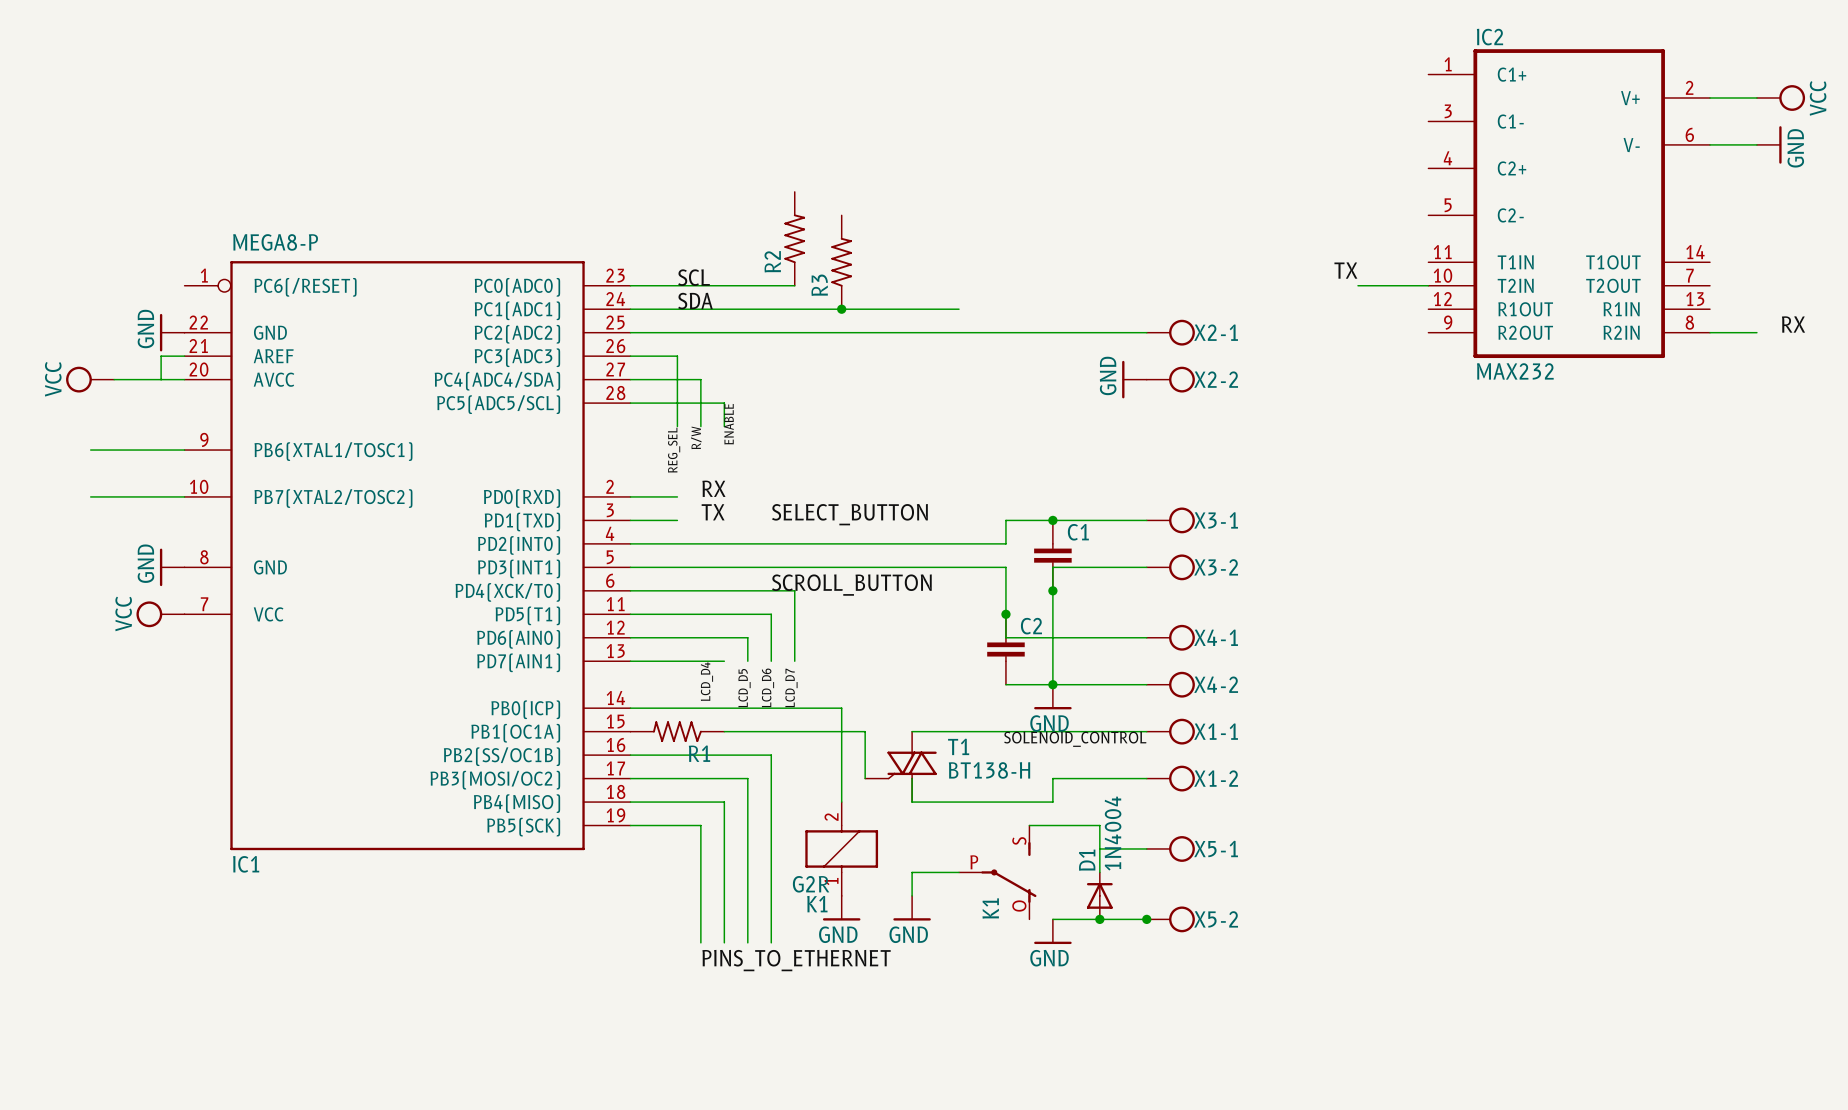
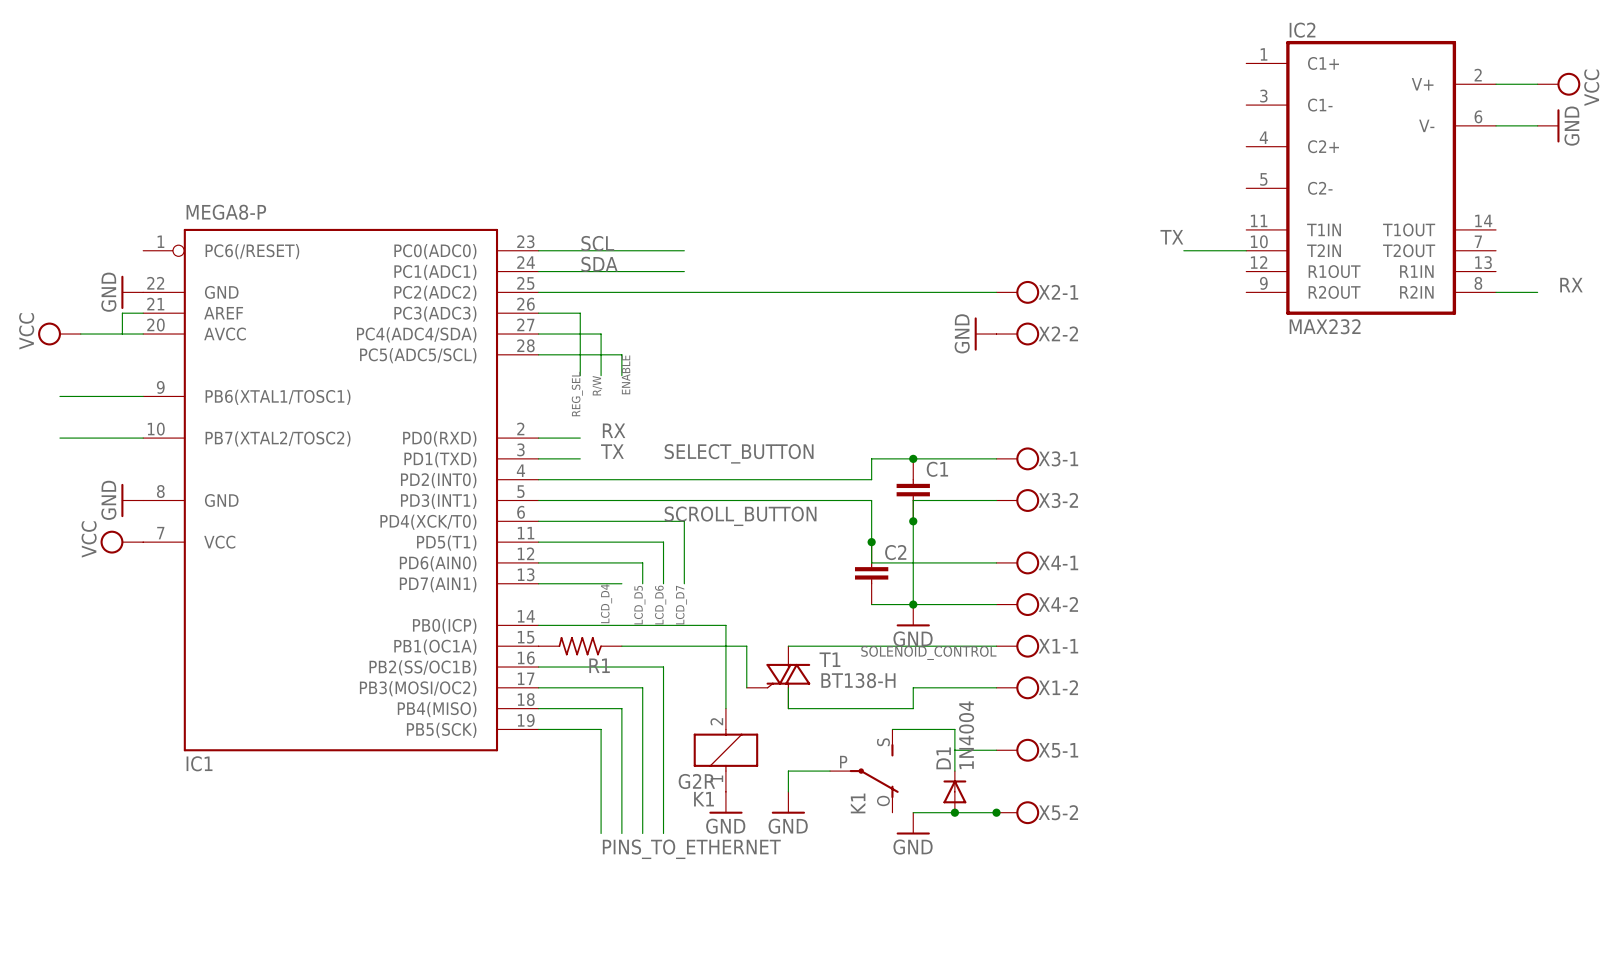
R2: (794, 238) -> none
R3: (841, 262) -> none
wire: (794, 309) (959, 309) -> none
junction: (841, 309) -> none

